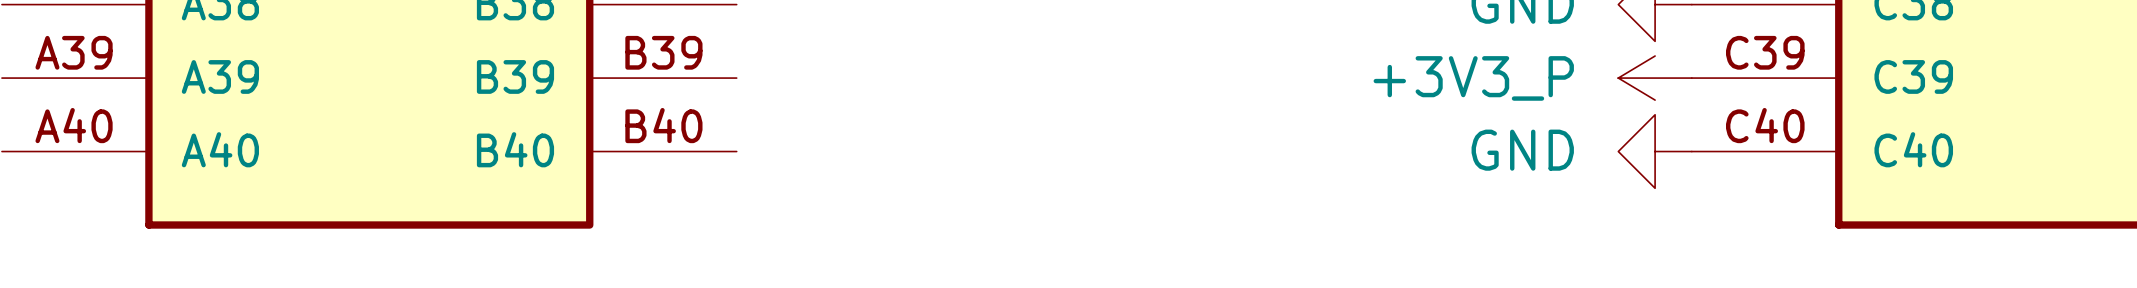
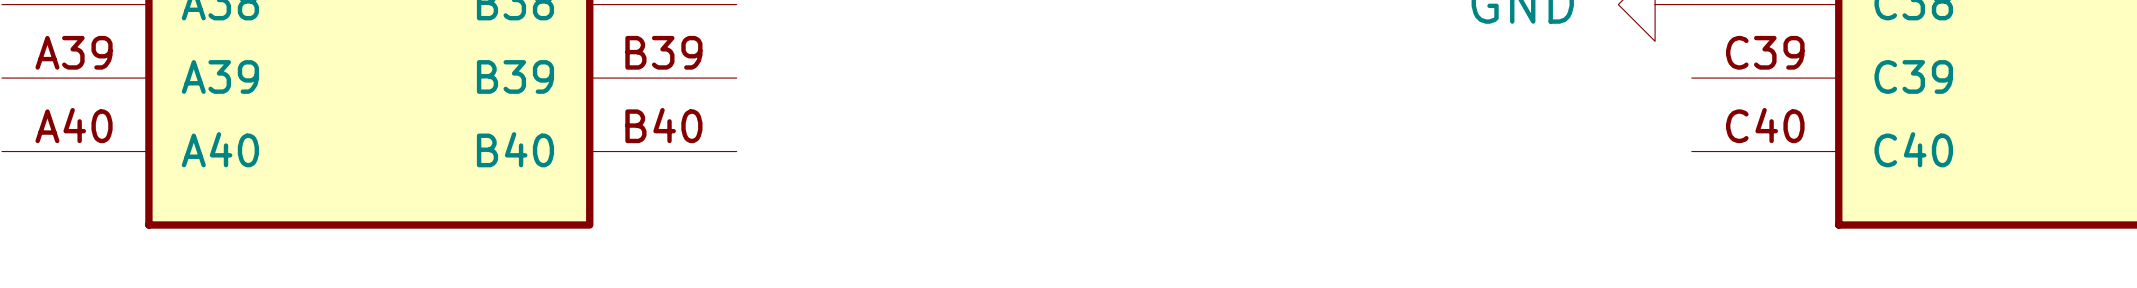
power symbol: +3V3_P (1655, 78) -> none
power symbol: GND (1655, 151) -> none

